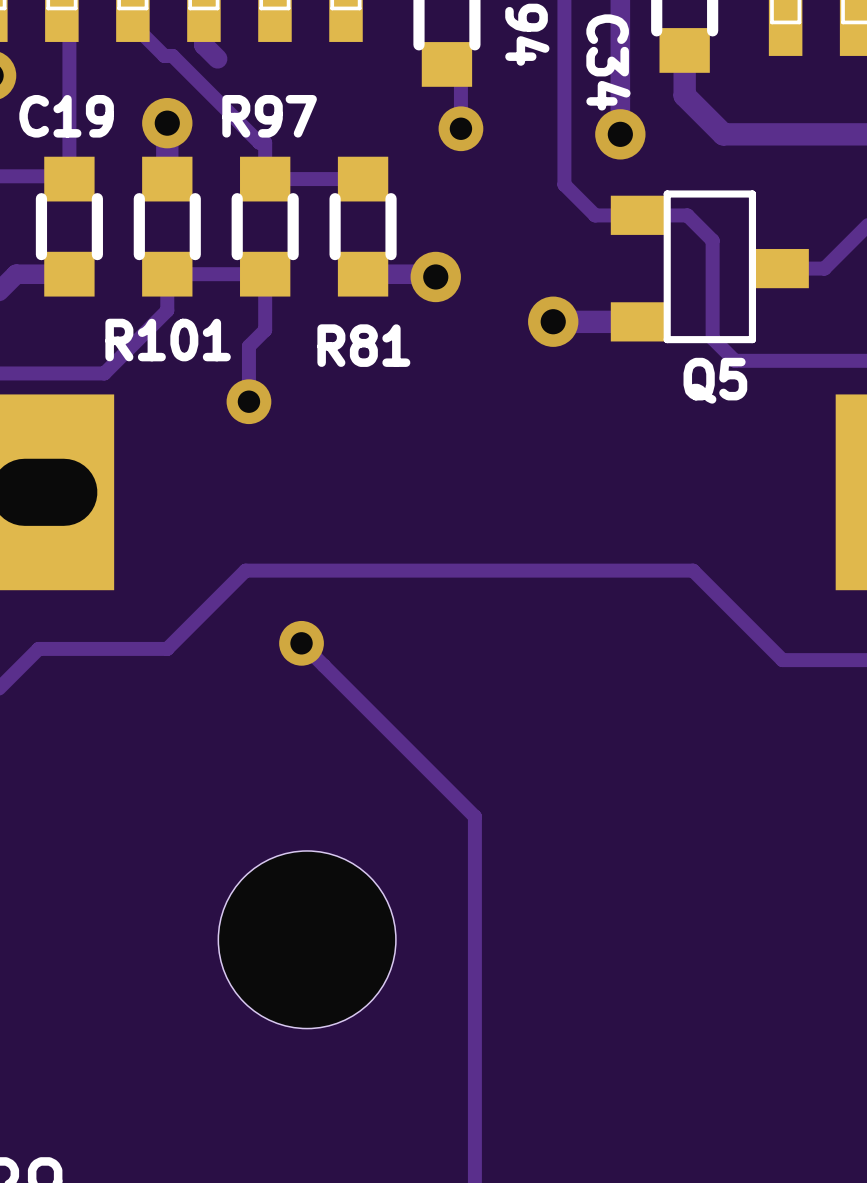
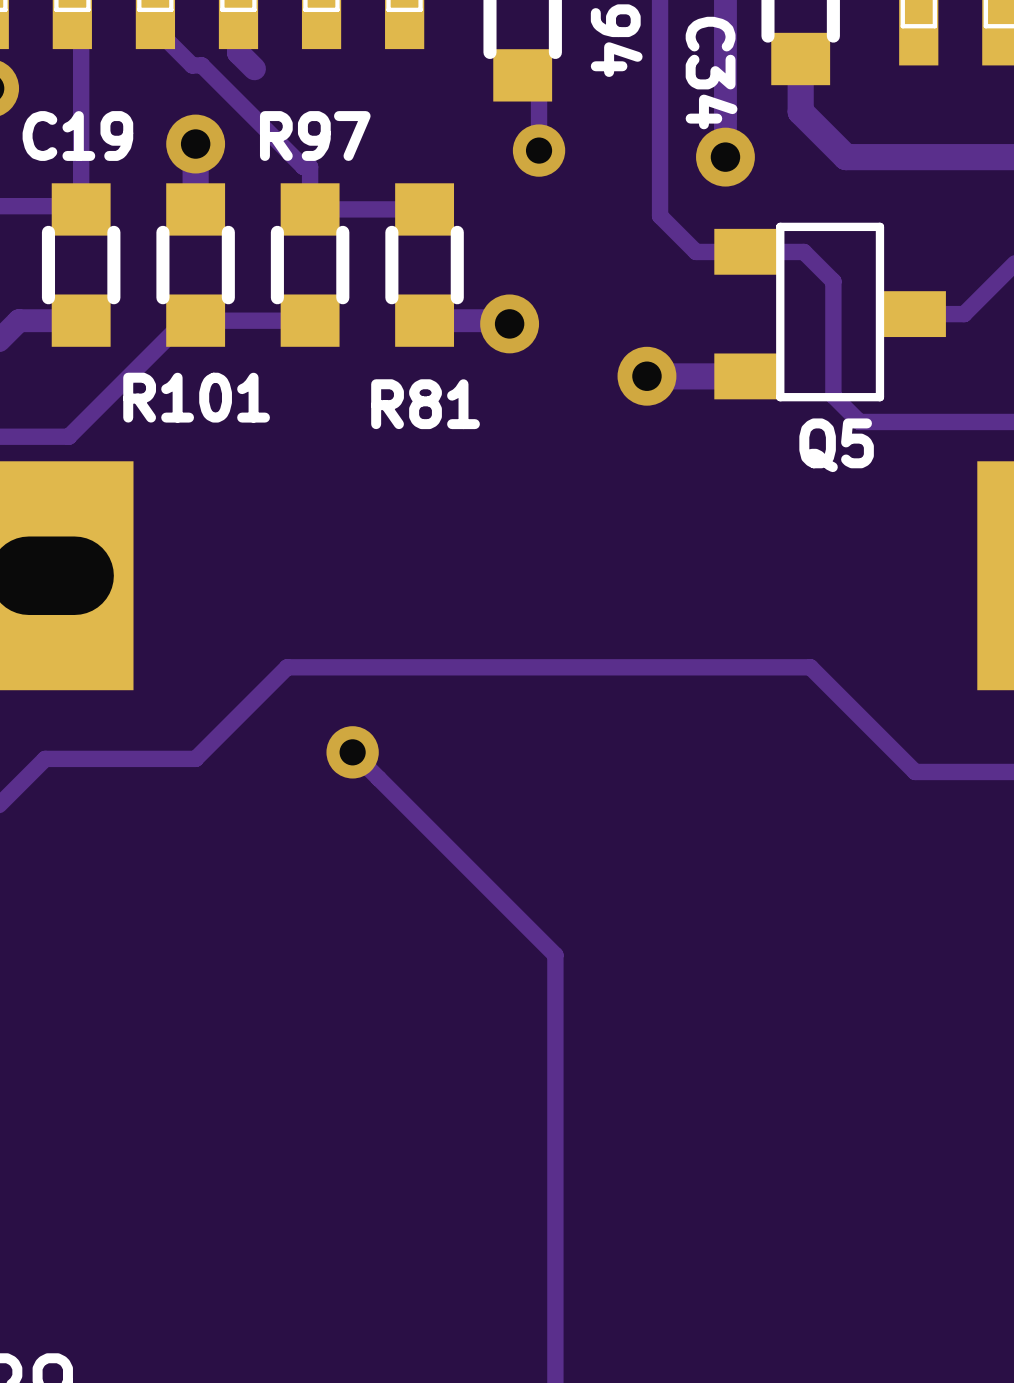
track: (167, 274) (167, 310) (104, 373) (58, 373) -> (195, 320) (184, 320) (68, 436)
track: (265, 274) (265, 330) (248, 346) (248, 401) -> none
via: (248, 401) -> none
part: (307, 939) -> none

